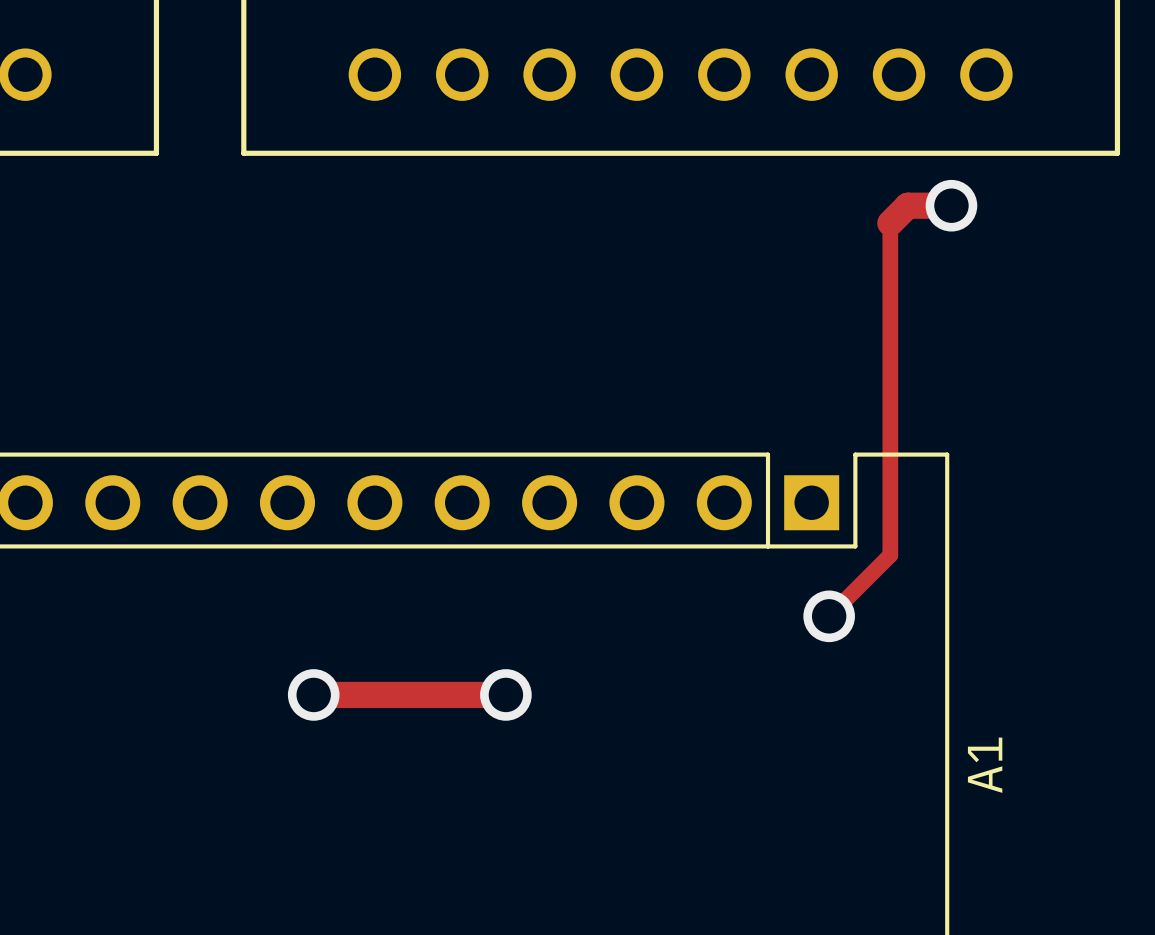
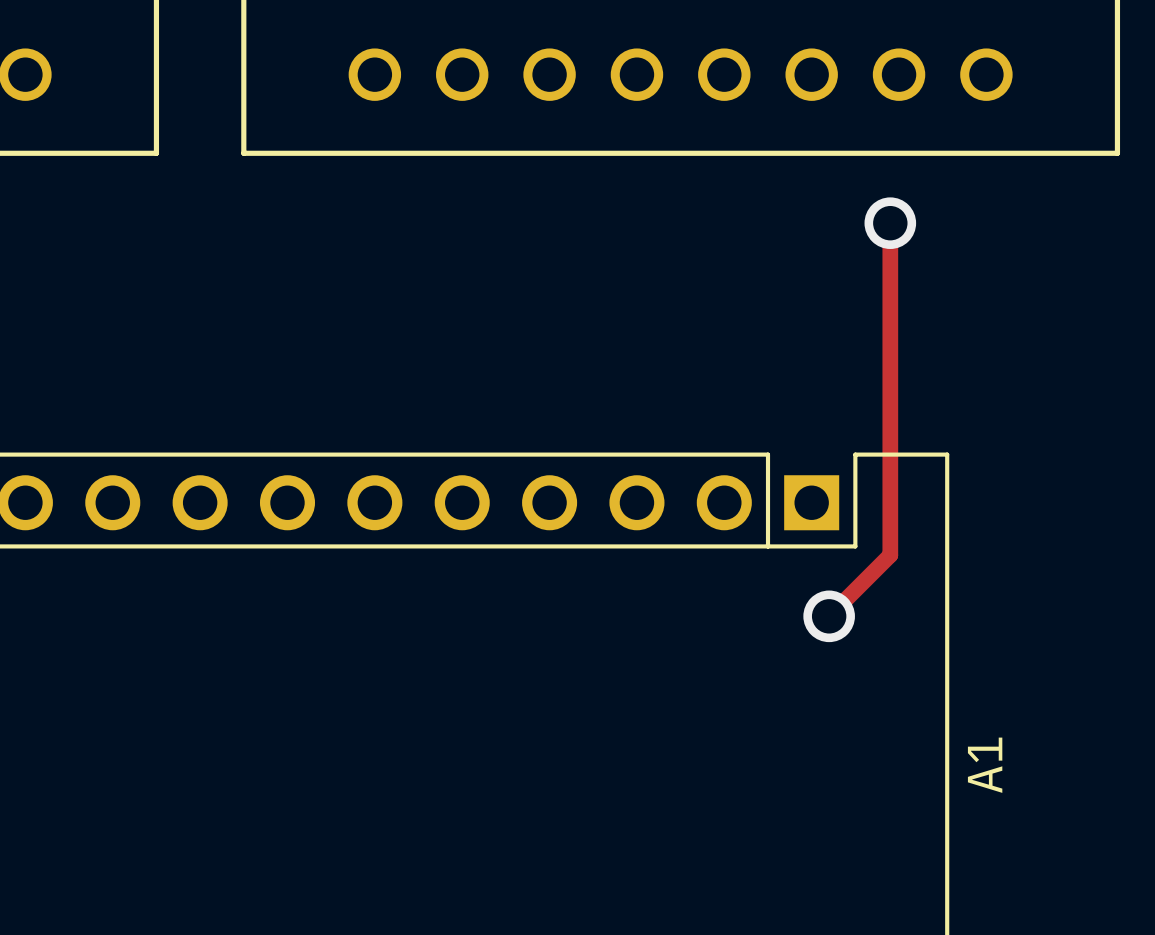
track: (951, 205) (907, 205) (890, 223) -> none
via position: (951, 205) -> (890, 223)
track: (313, 694) (505, 694) -> none
via: (313, 694) -> none
via: (505, 694) -> none

